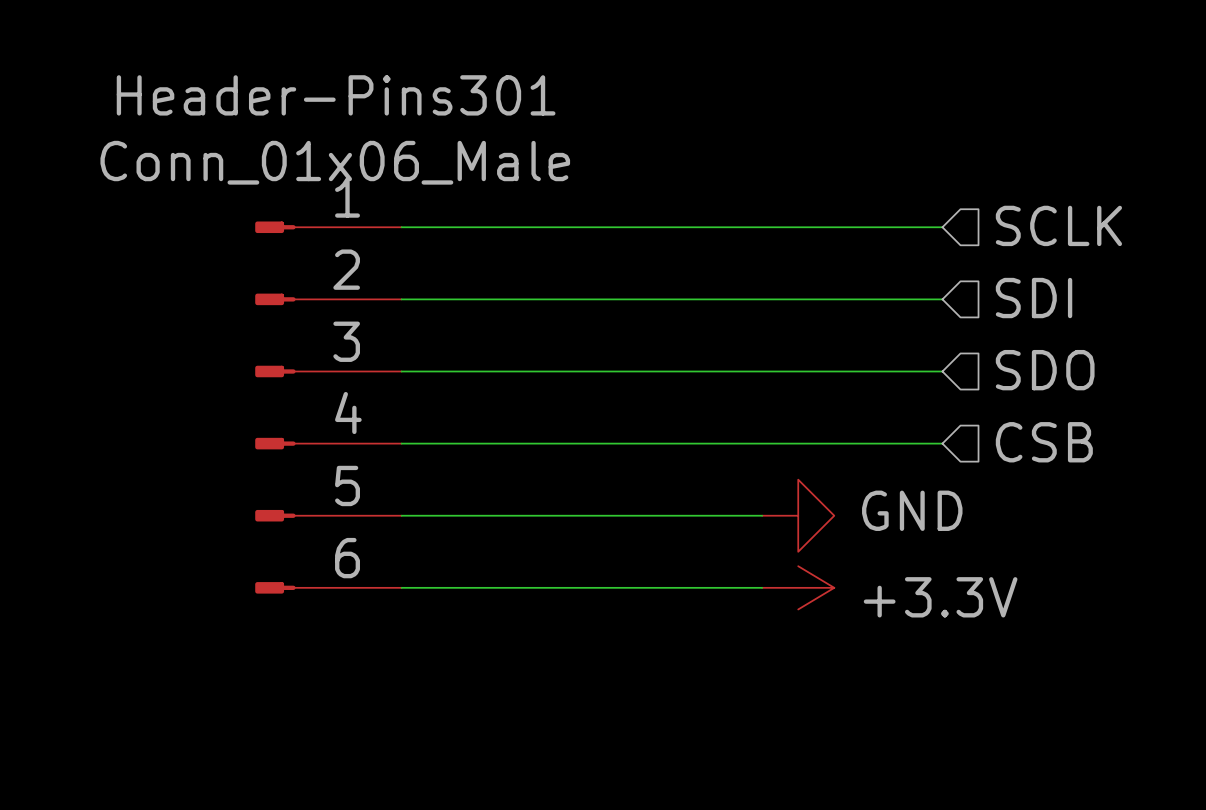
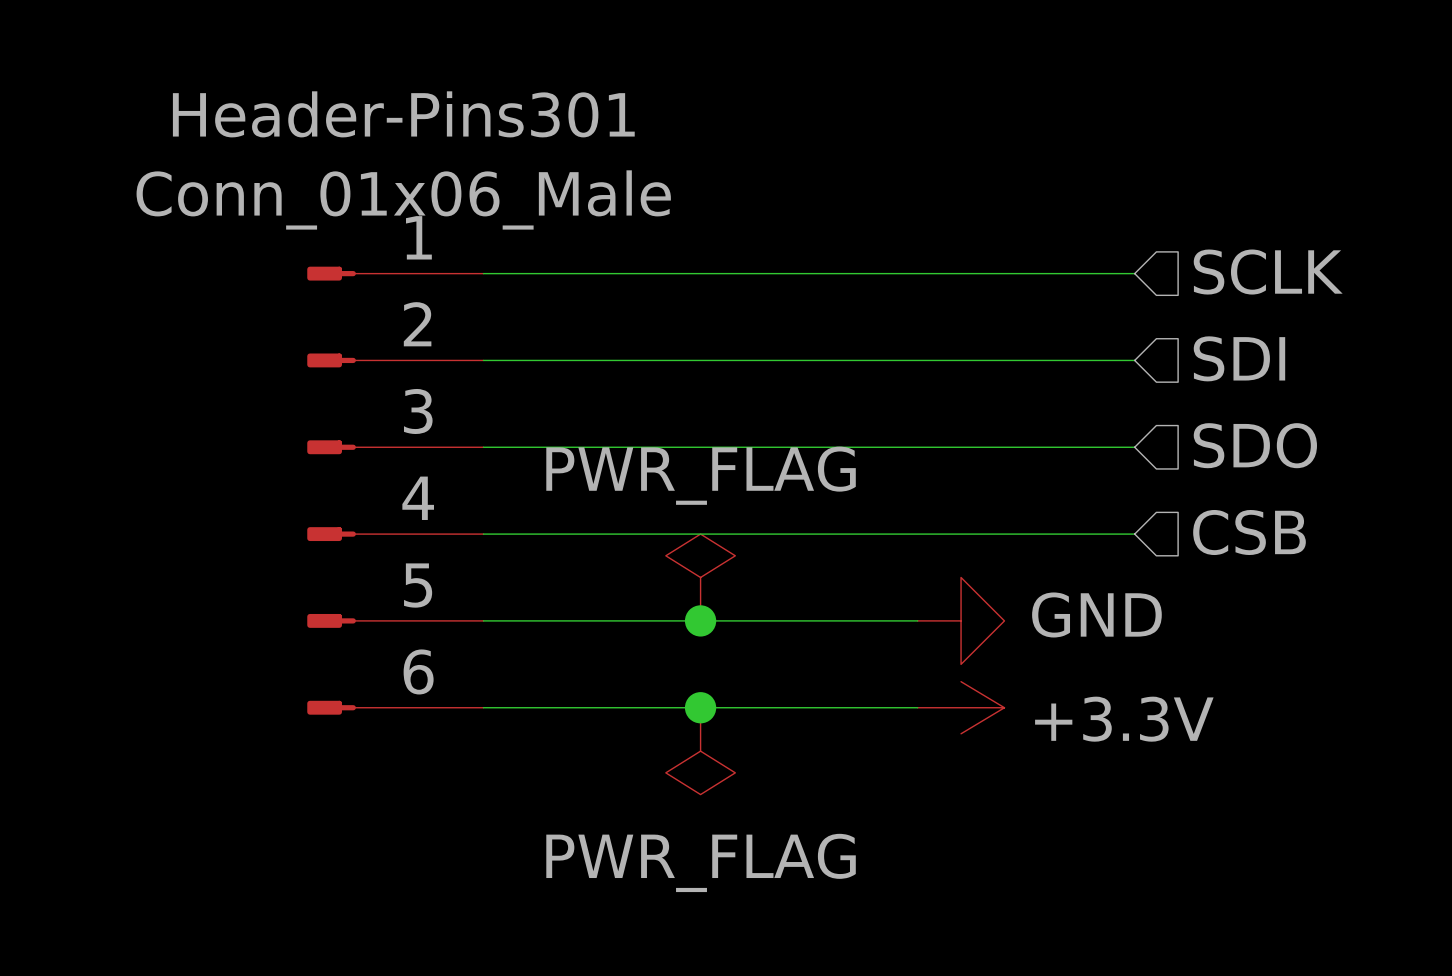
power symbol: none -> PWR_FLAG (700, 577)
junction: none -> (700, 620)
junction: none -> (700, 707)
power symbol: none -> PWR_FLAG (700, 751)

